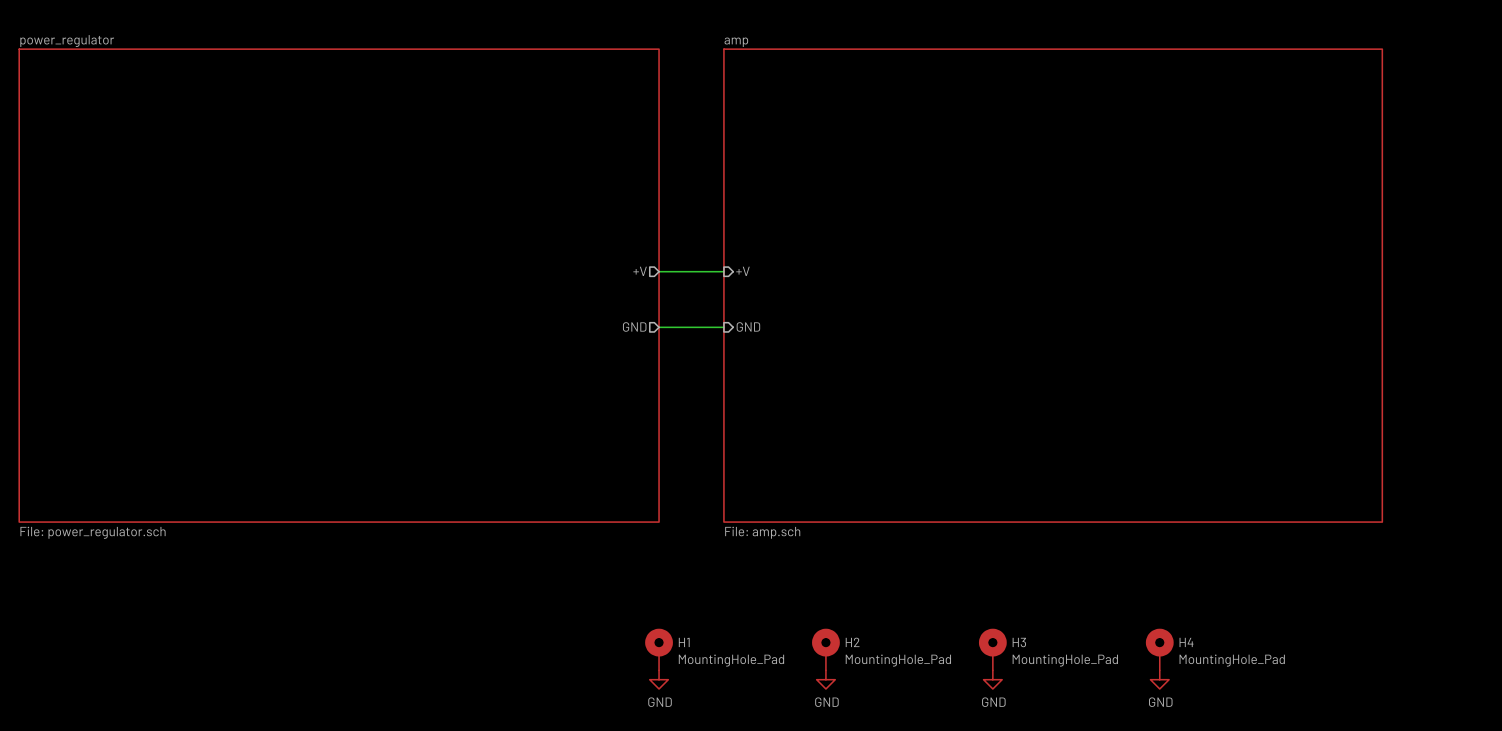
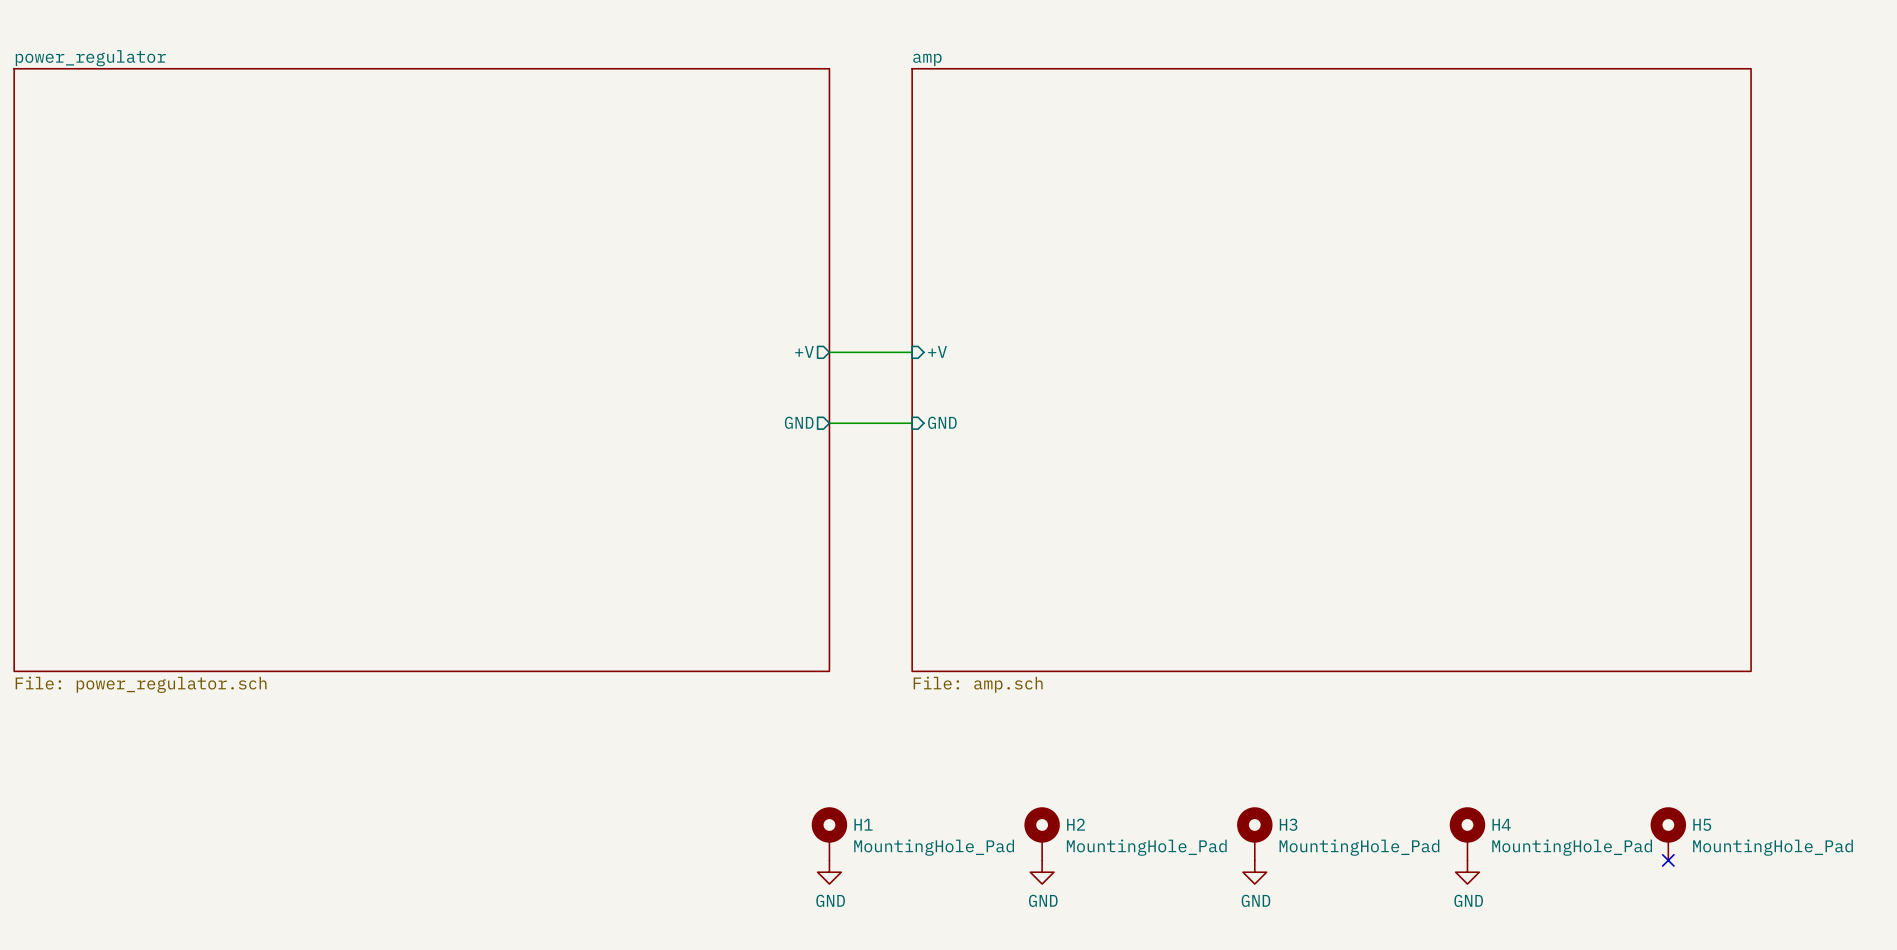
H5: none -> MountingHole_Pad (1668, 833)
no-connect mark: none -> (1668, 860)

